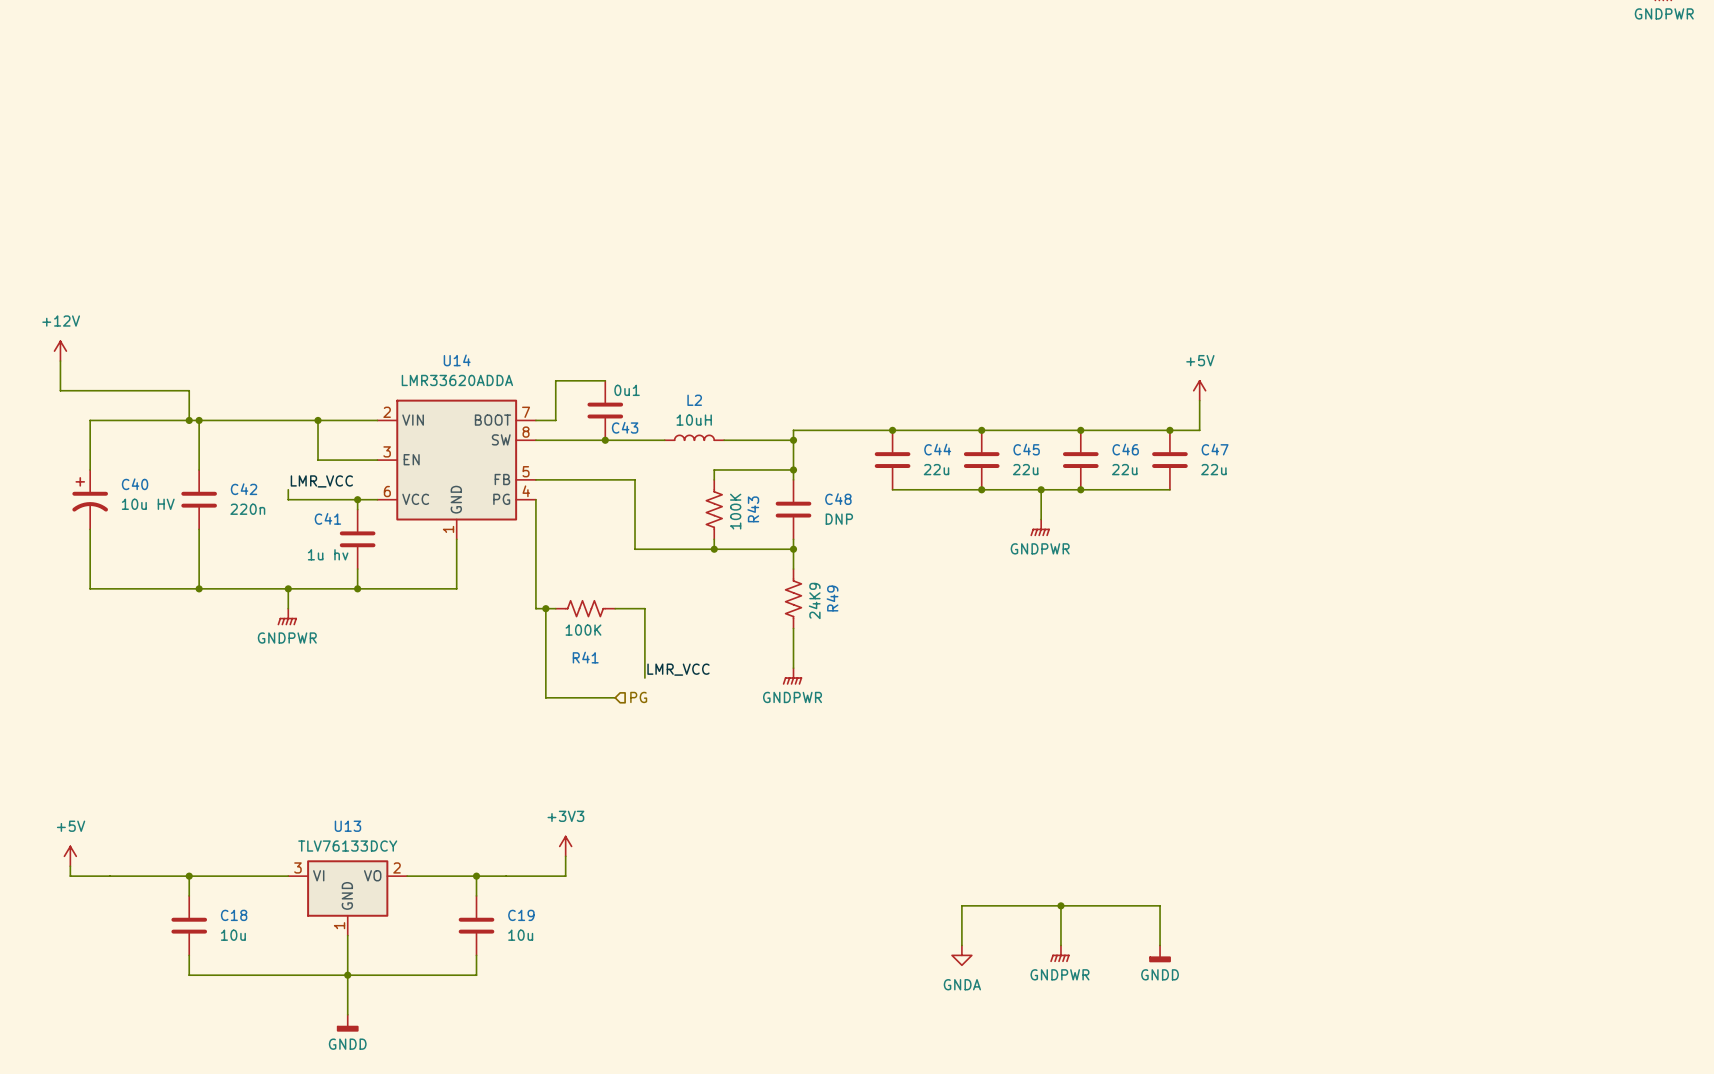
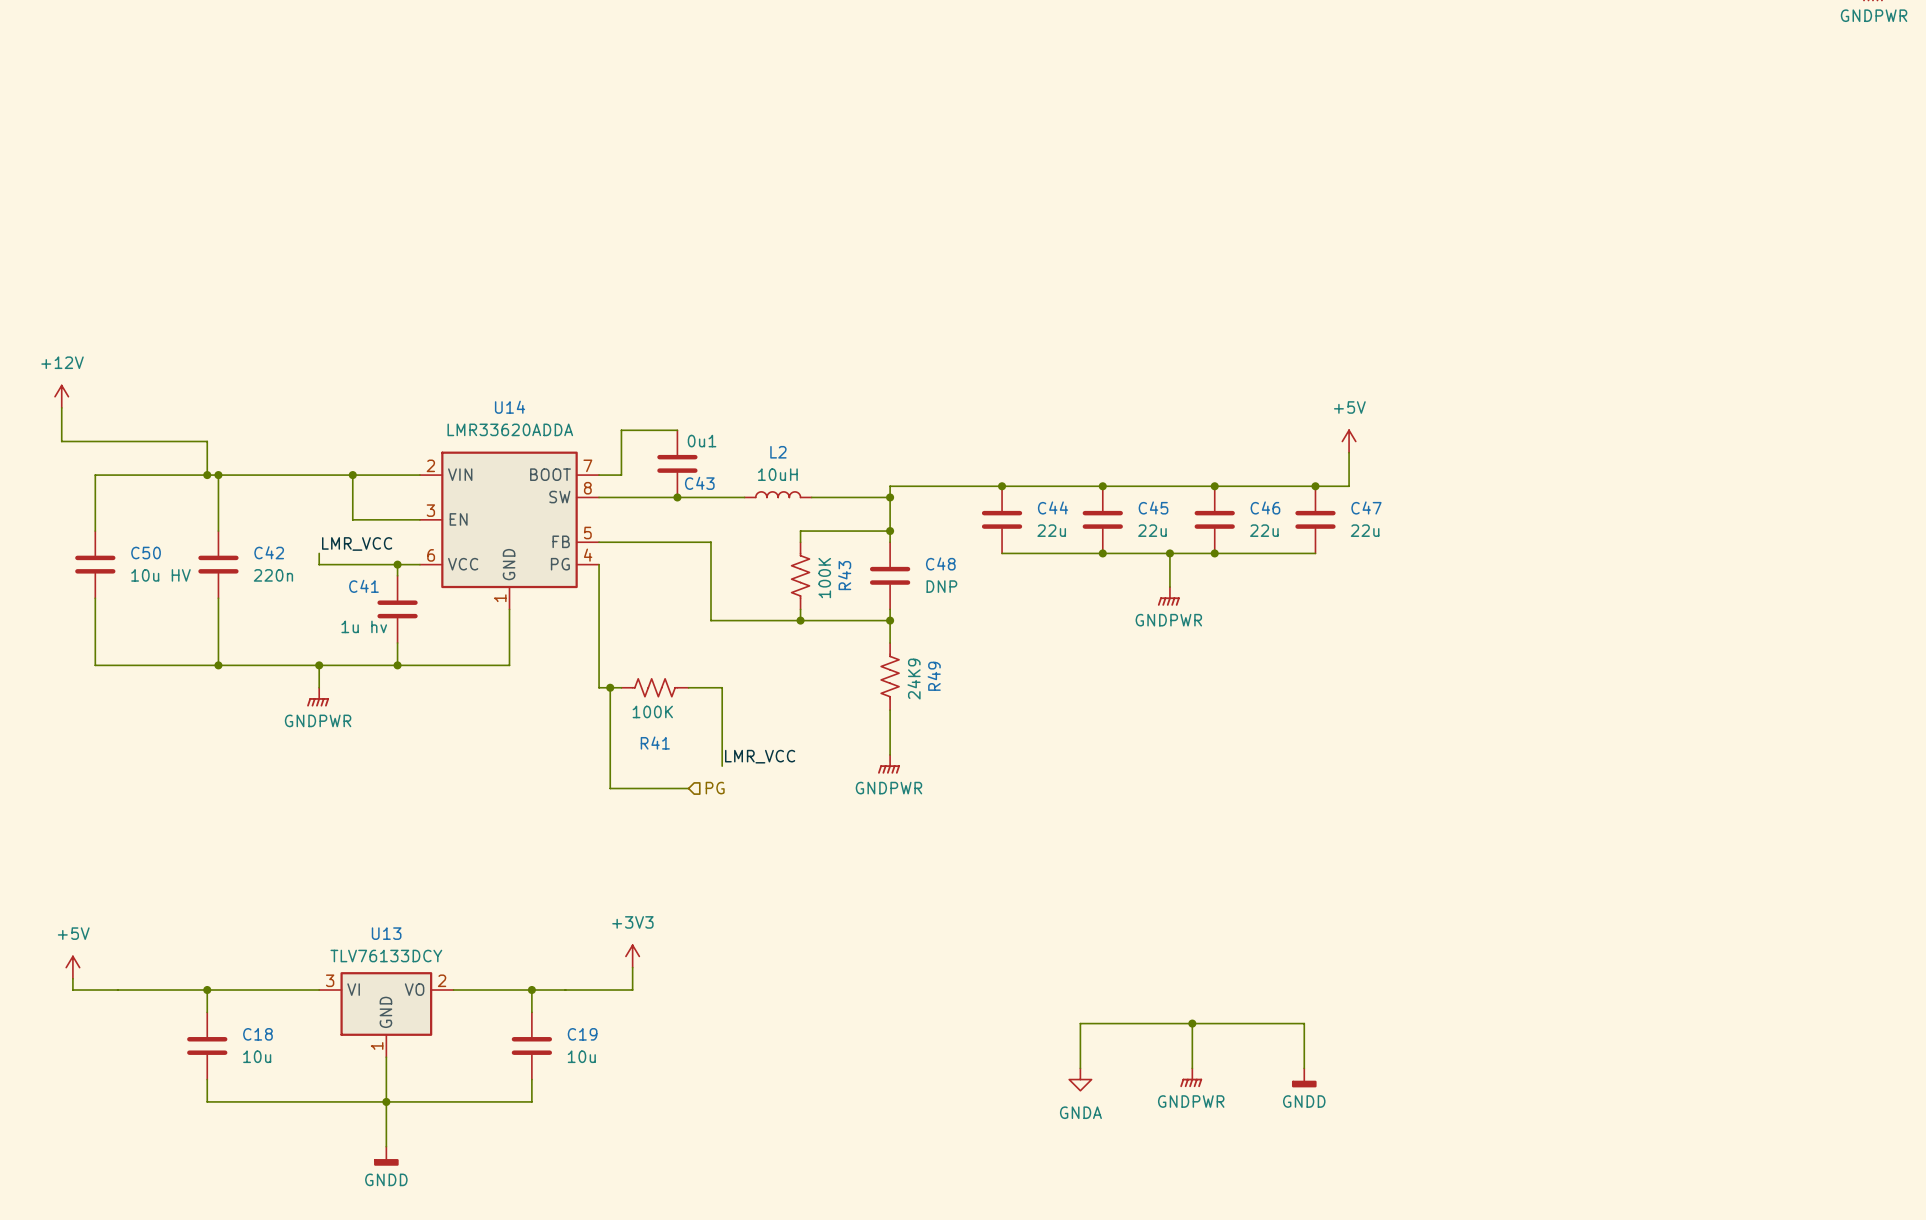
C40: 10u HV (90, 499) -> none
C50: none -> 10u HV (95, 564)

